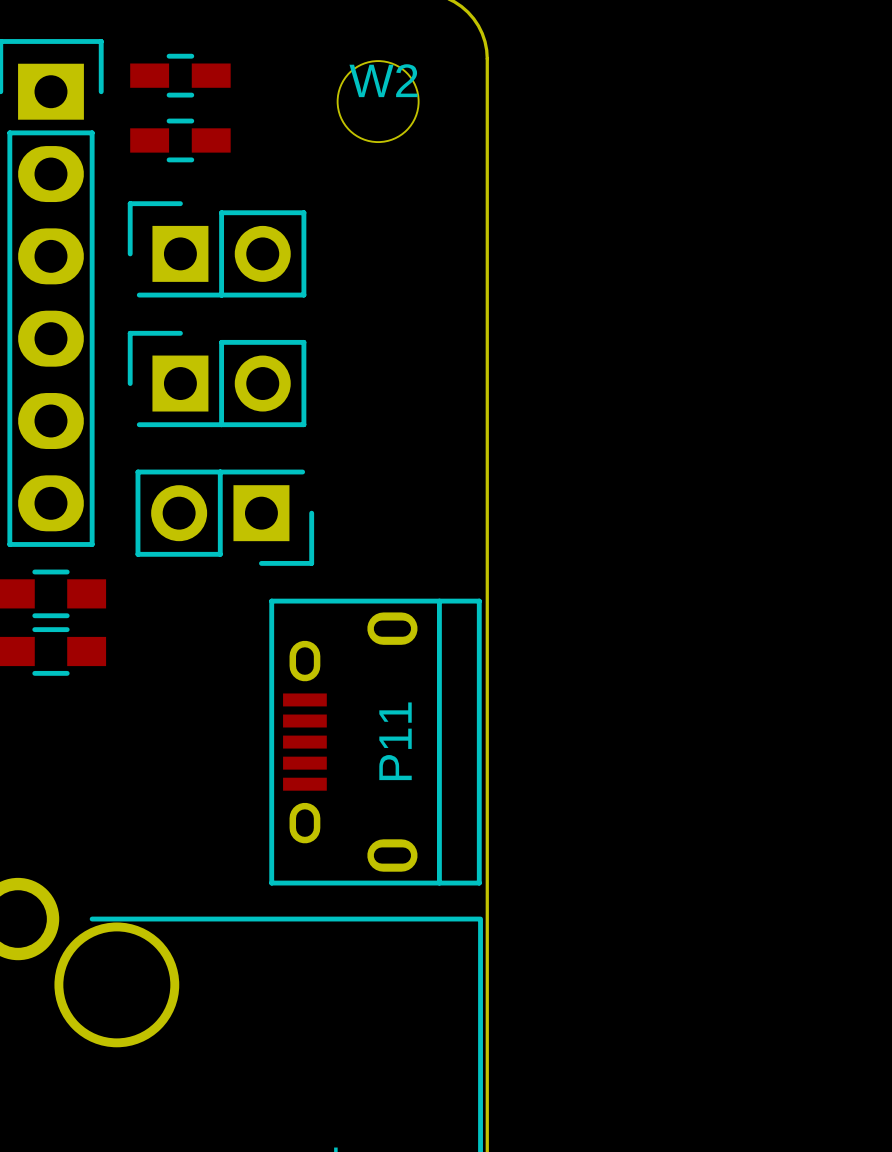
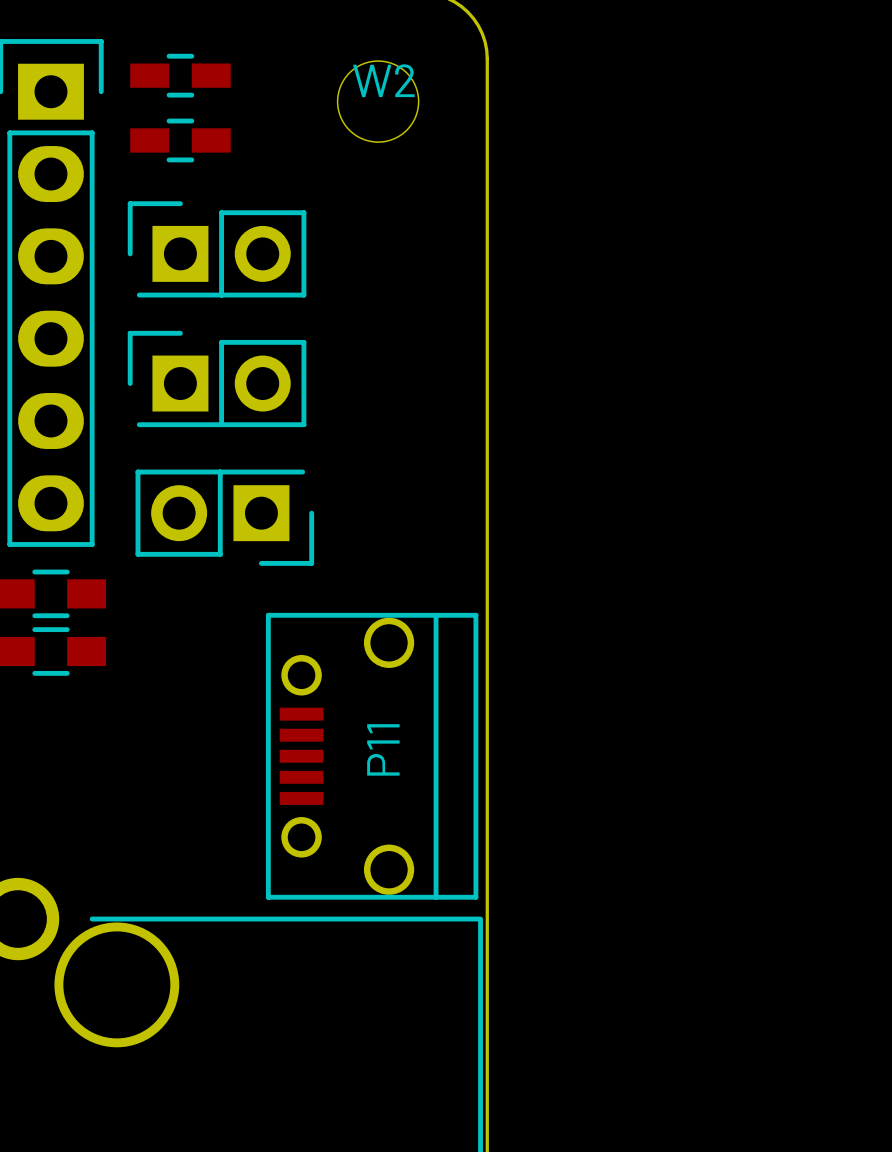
P11 footprint: [269, 598, 482, 886] -> [265, 612, 479, 900]

